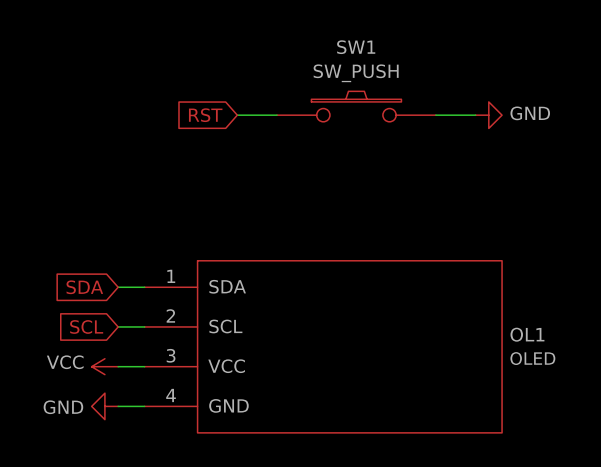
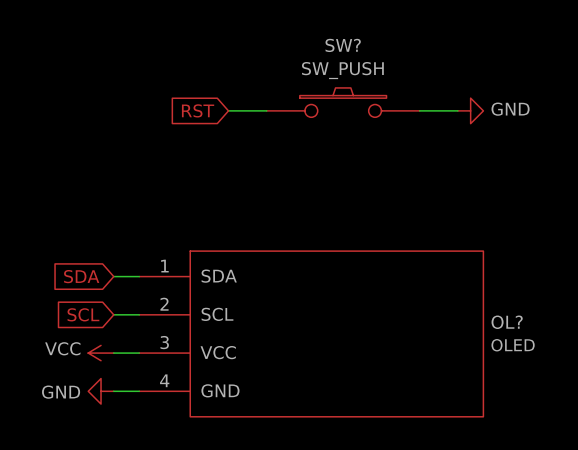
SW1 name: SW1 (356, 47) -> SW? (343, 45)
OL1 name: OL1 (527, 334) -> OL? (507, 322)

